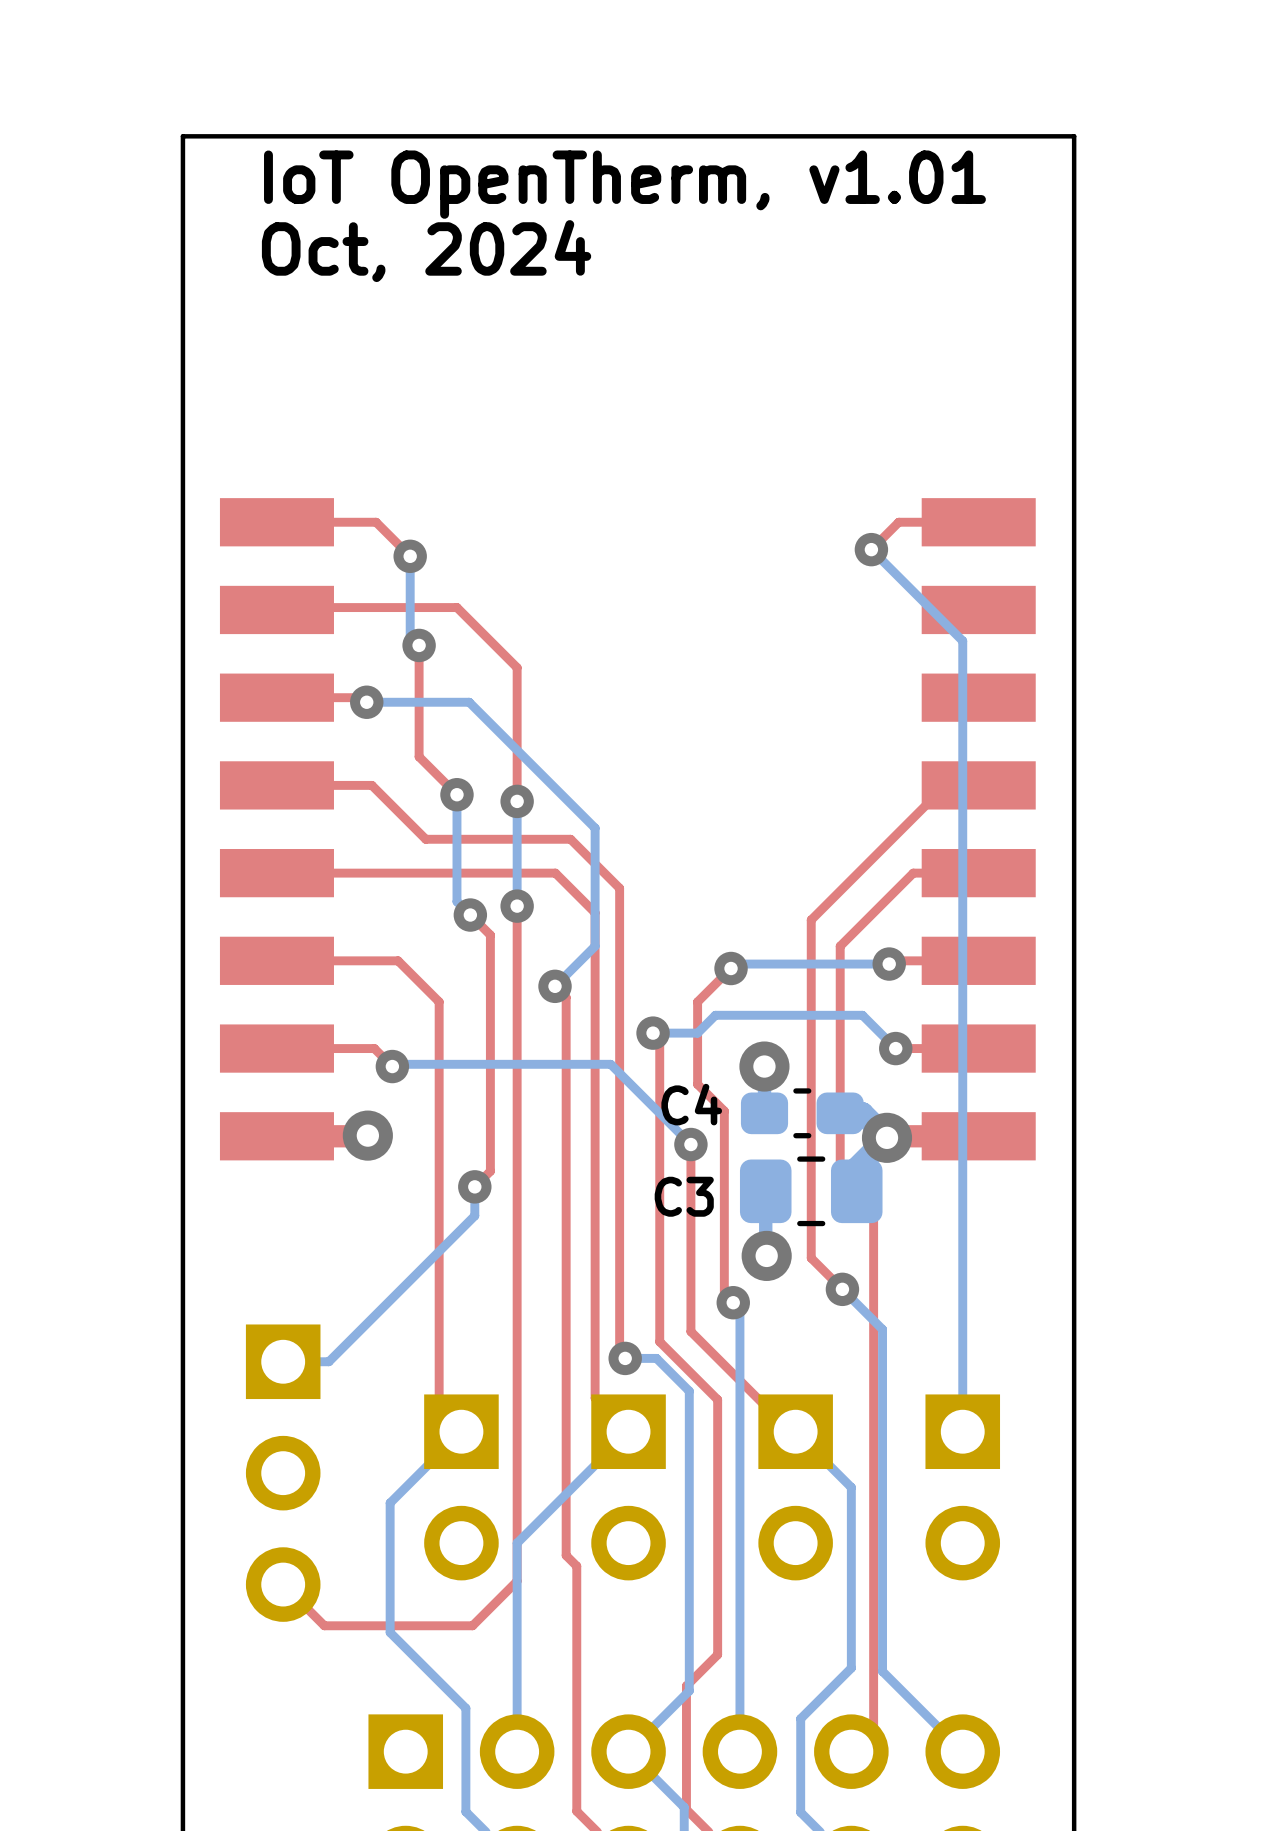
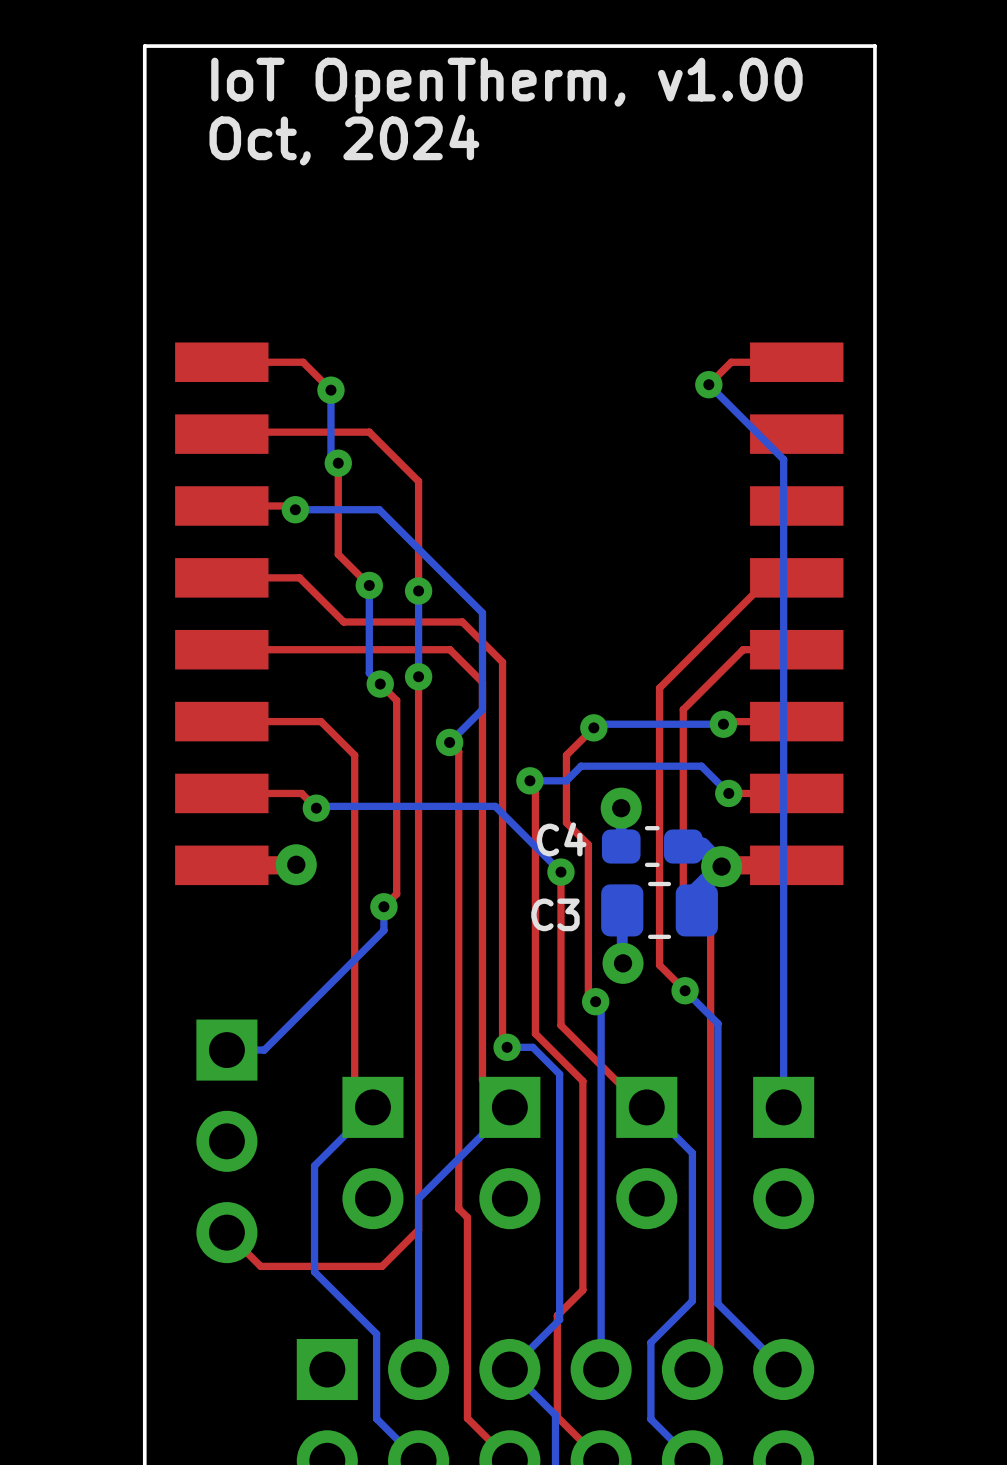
text: IoT OpenTherm, v1.01 (624, 184) -> IoT OpenTherm, v1.00 (506, 85)

